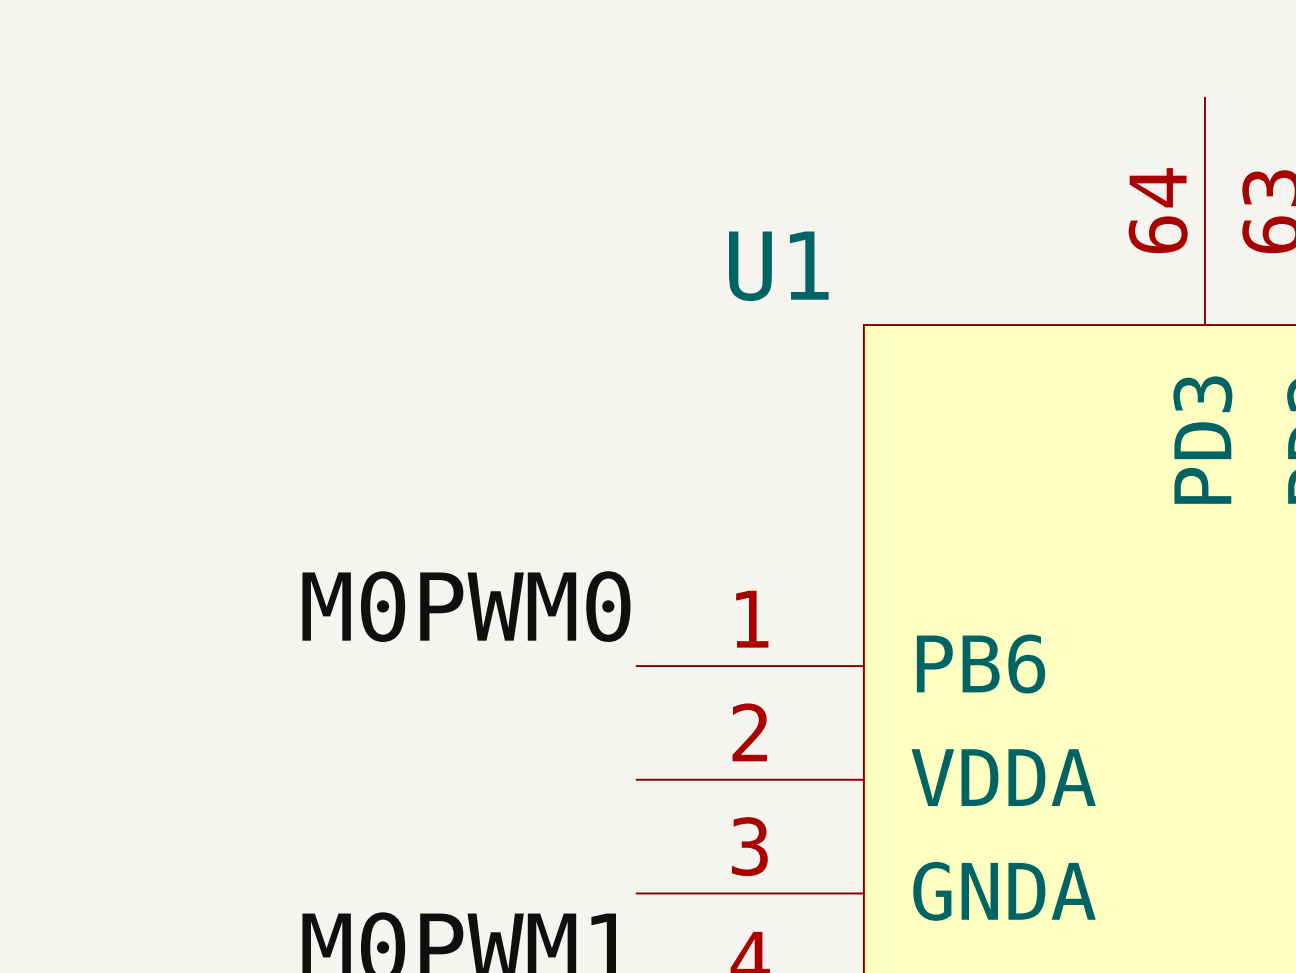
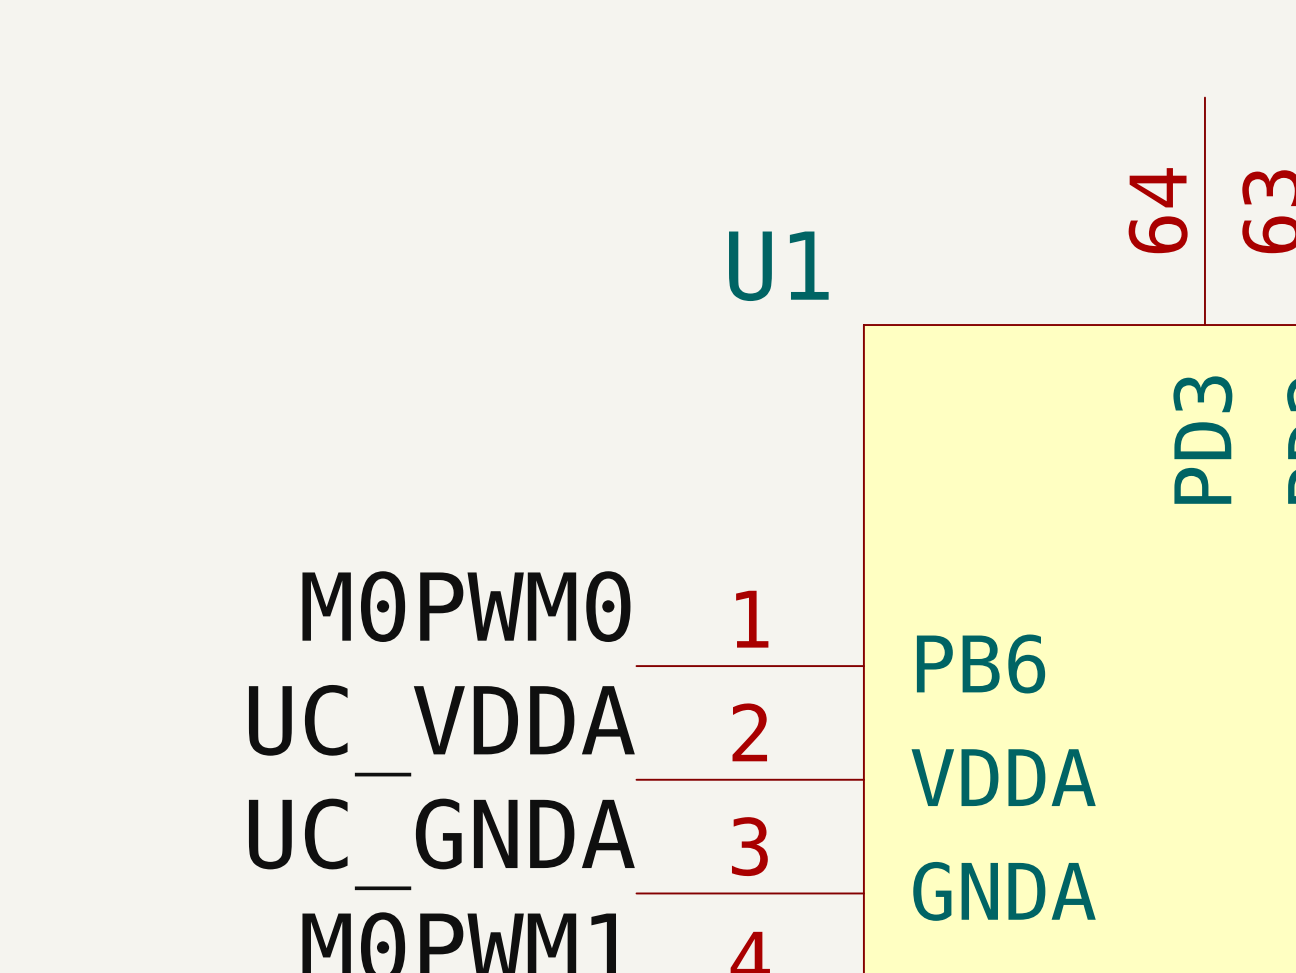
label: none -> UC_VDDA (441, 730)
label: none -> UC_GNDA (441, 844)

